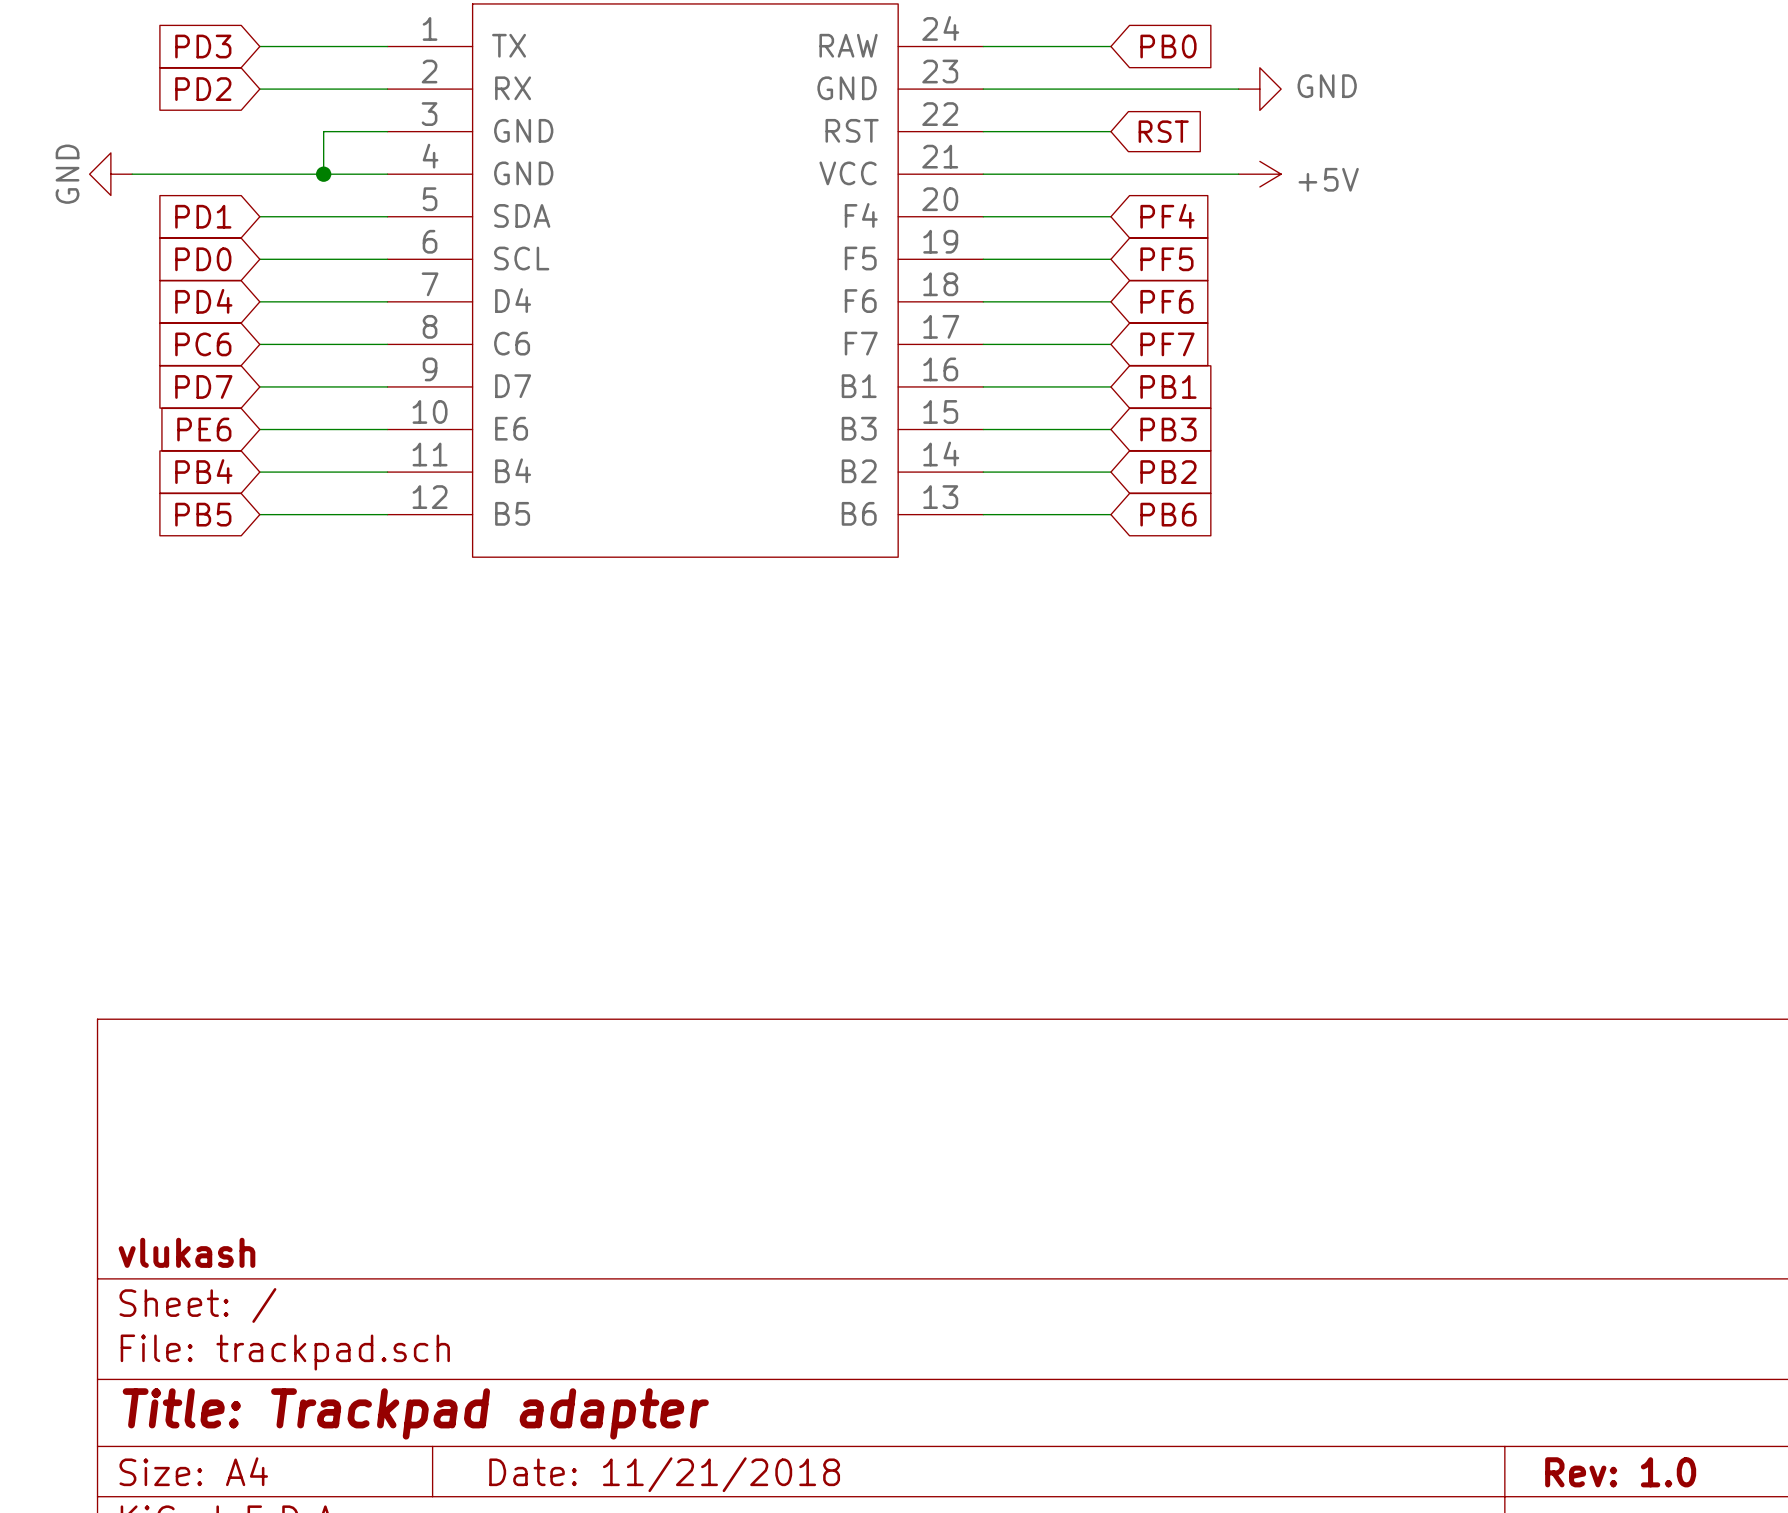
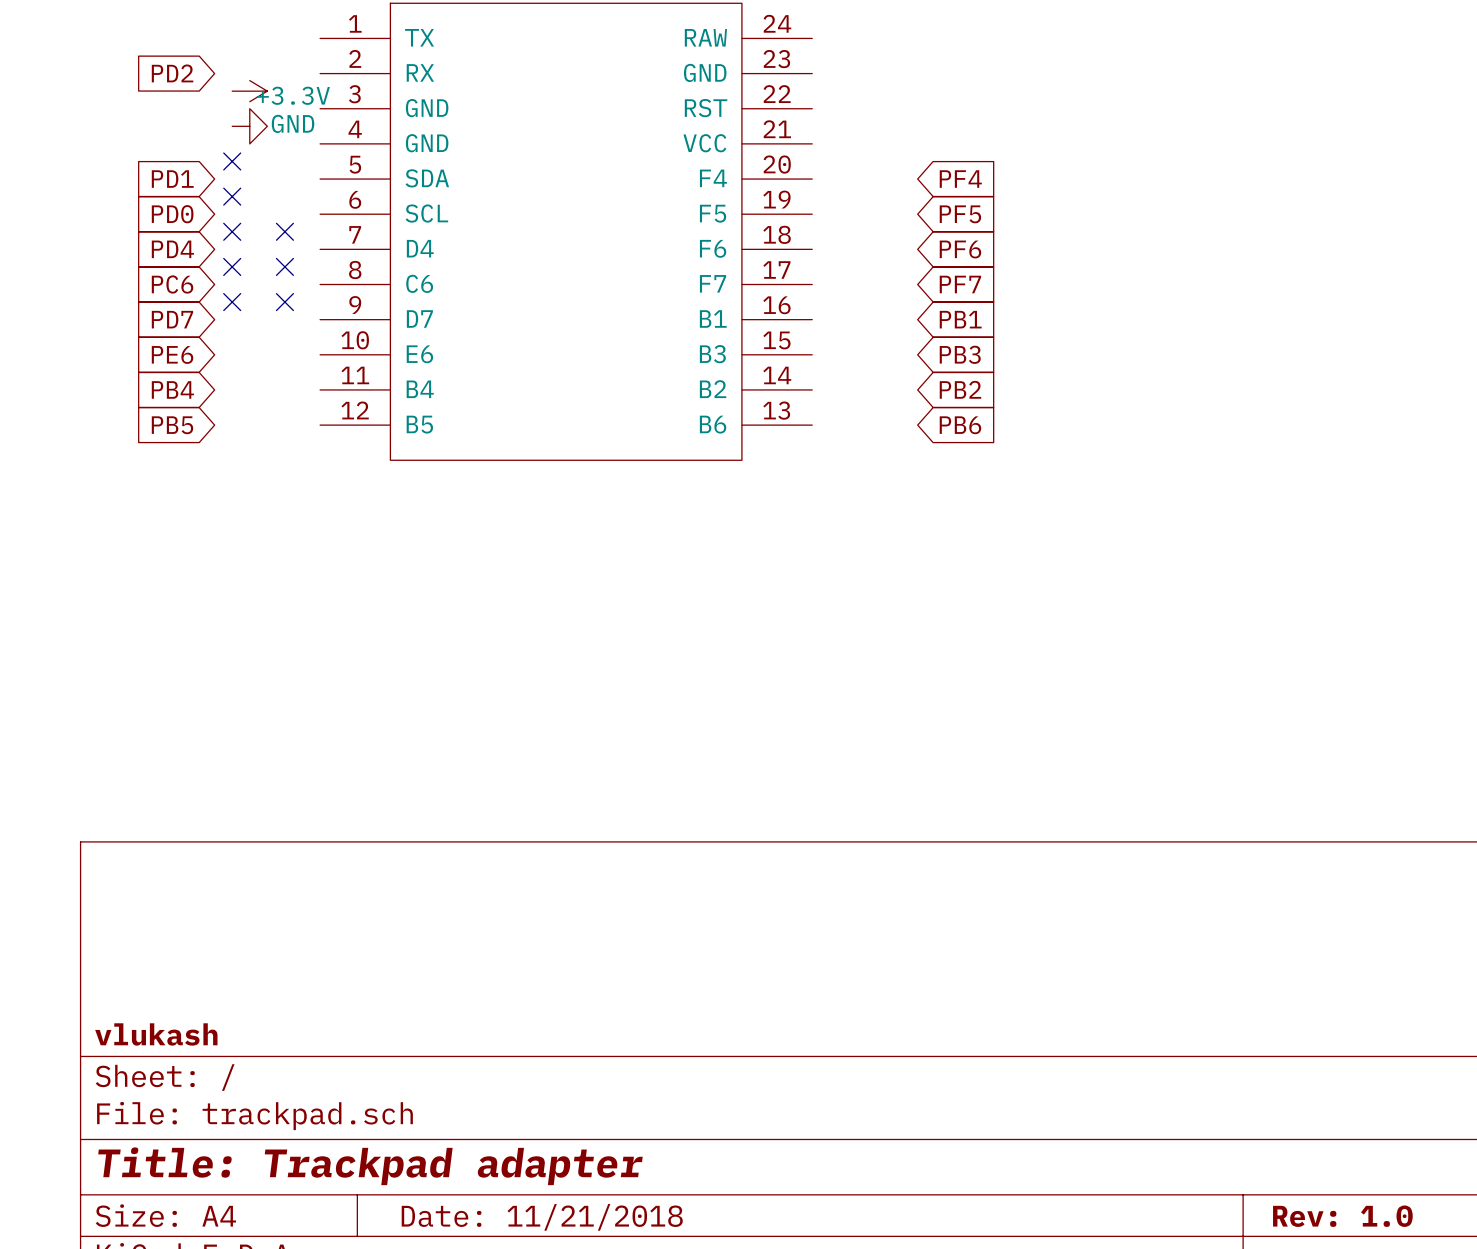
global label: PD3 (203, 46) -> none
wire: (259, 46) (387, 46) -> none
wire: (983, 46) (1110, 46) -> none
global label: PB0 (1168, 46) -> none
wire: (259, 89) (387, 89) -> none
wire: (983, 89) (1238, 89) -> none
power symbol: GND (1259, 89) -> none
power symbol: none -> +3.3V (249, 91)
wire: (387, 131) (323, 131) (323, 174) -> none
wire: (983, 131) (1110, 131) -> none
global label: RST (1163, 131) -> none
power symbol rotation: 0° (110, 174) -> 180° (249, 126)
power symbol position: GND (110, 174) -> GND (249, 126)
wire: (132, 174) (387, 174) -> none
junction: (323, 174) -> none
wire: (983, 174) (1238, 174) -> none
power symbol: +5V (1259, 174) -> none
no-connect mark: none -> (232, 161)
wire: (259, 216) (387, 216) -> none
wire: (983, 216) (1110, 216) -> none
no-connect mark: none -> (232, 196)
wire: (259, 259) (387, 259) -> none
wire: (983, 259) (1110, 259) -> none
no-connect mark: none -> (232, 231)
no-connect mark: none -> (284, 231)
wire: (259, 301) (387, 301) -> none
wire: (983, 301) (1110, 301) -> none
no-connect mark: none -> (232, 266)
no-connect mark: none -> (284, 266)
wire: (259, 344) (387, 344) -> none
wire: (983, 344) (1110, 344) -> none
no-connect mark: none -> (232, 302)
no-connect mark: none -> (284, 302)
wire: (259, 386) (387, 386) -> none
wire: (983, 386) (1110, 386) -> none
wire: (259, 429) (387, 429) -> none
wire: (983, 429) (1110, 429) -> none
wire: (259, 472) (387, 472) -> none
wire: (983, 472) (1110, 472) -> none
wire: (259, 514) (387, 514) -> none
wire: (983, 514) (1110, 514) -> none

